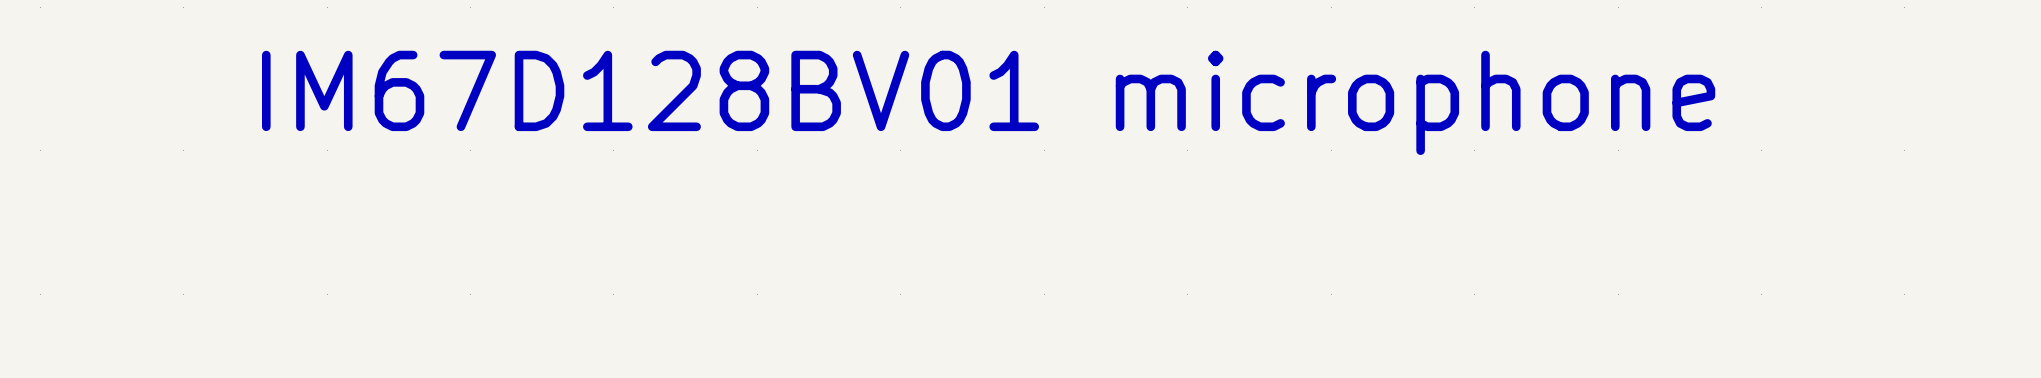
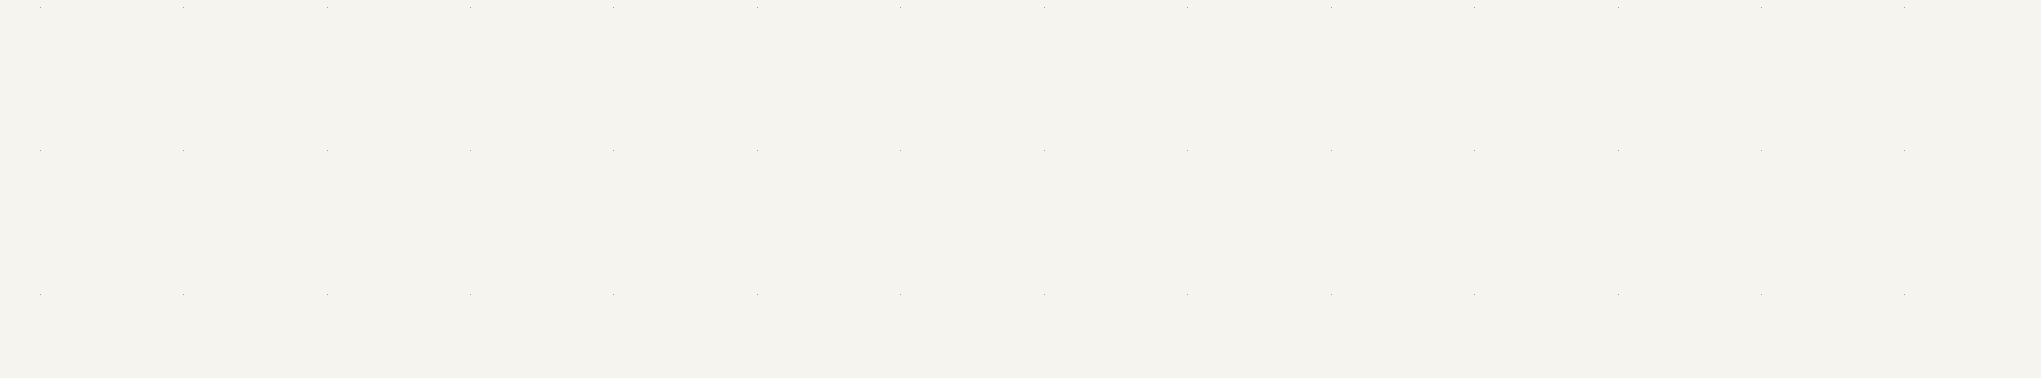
text: IM67D128BV01 microphone (988, 102) -> none

